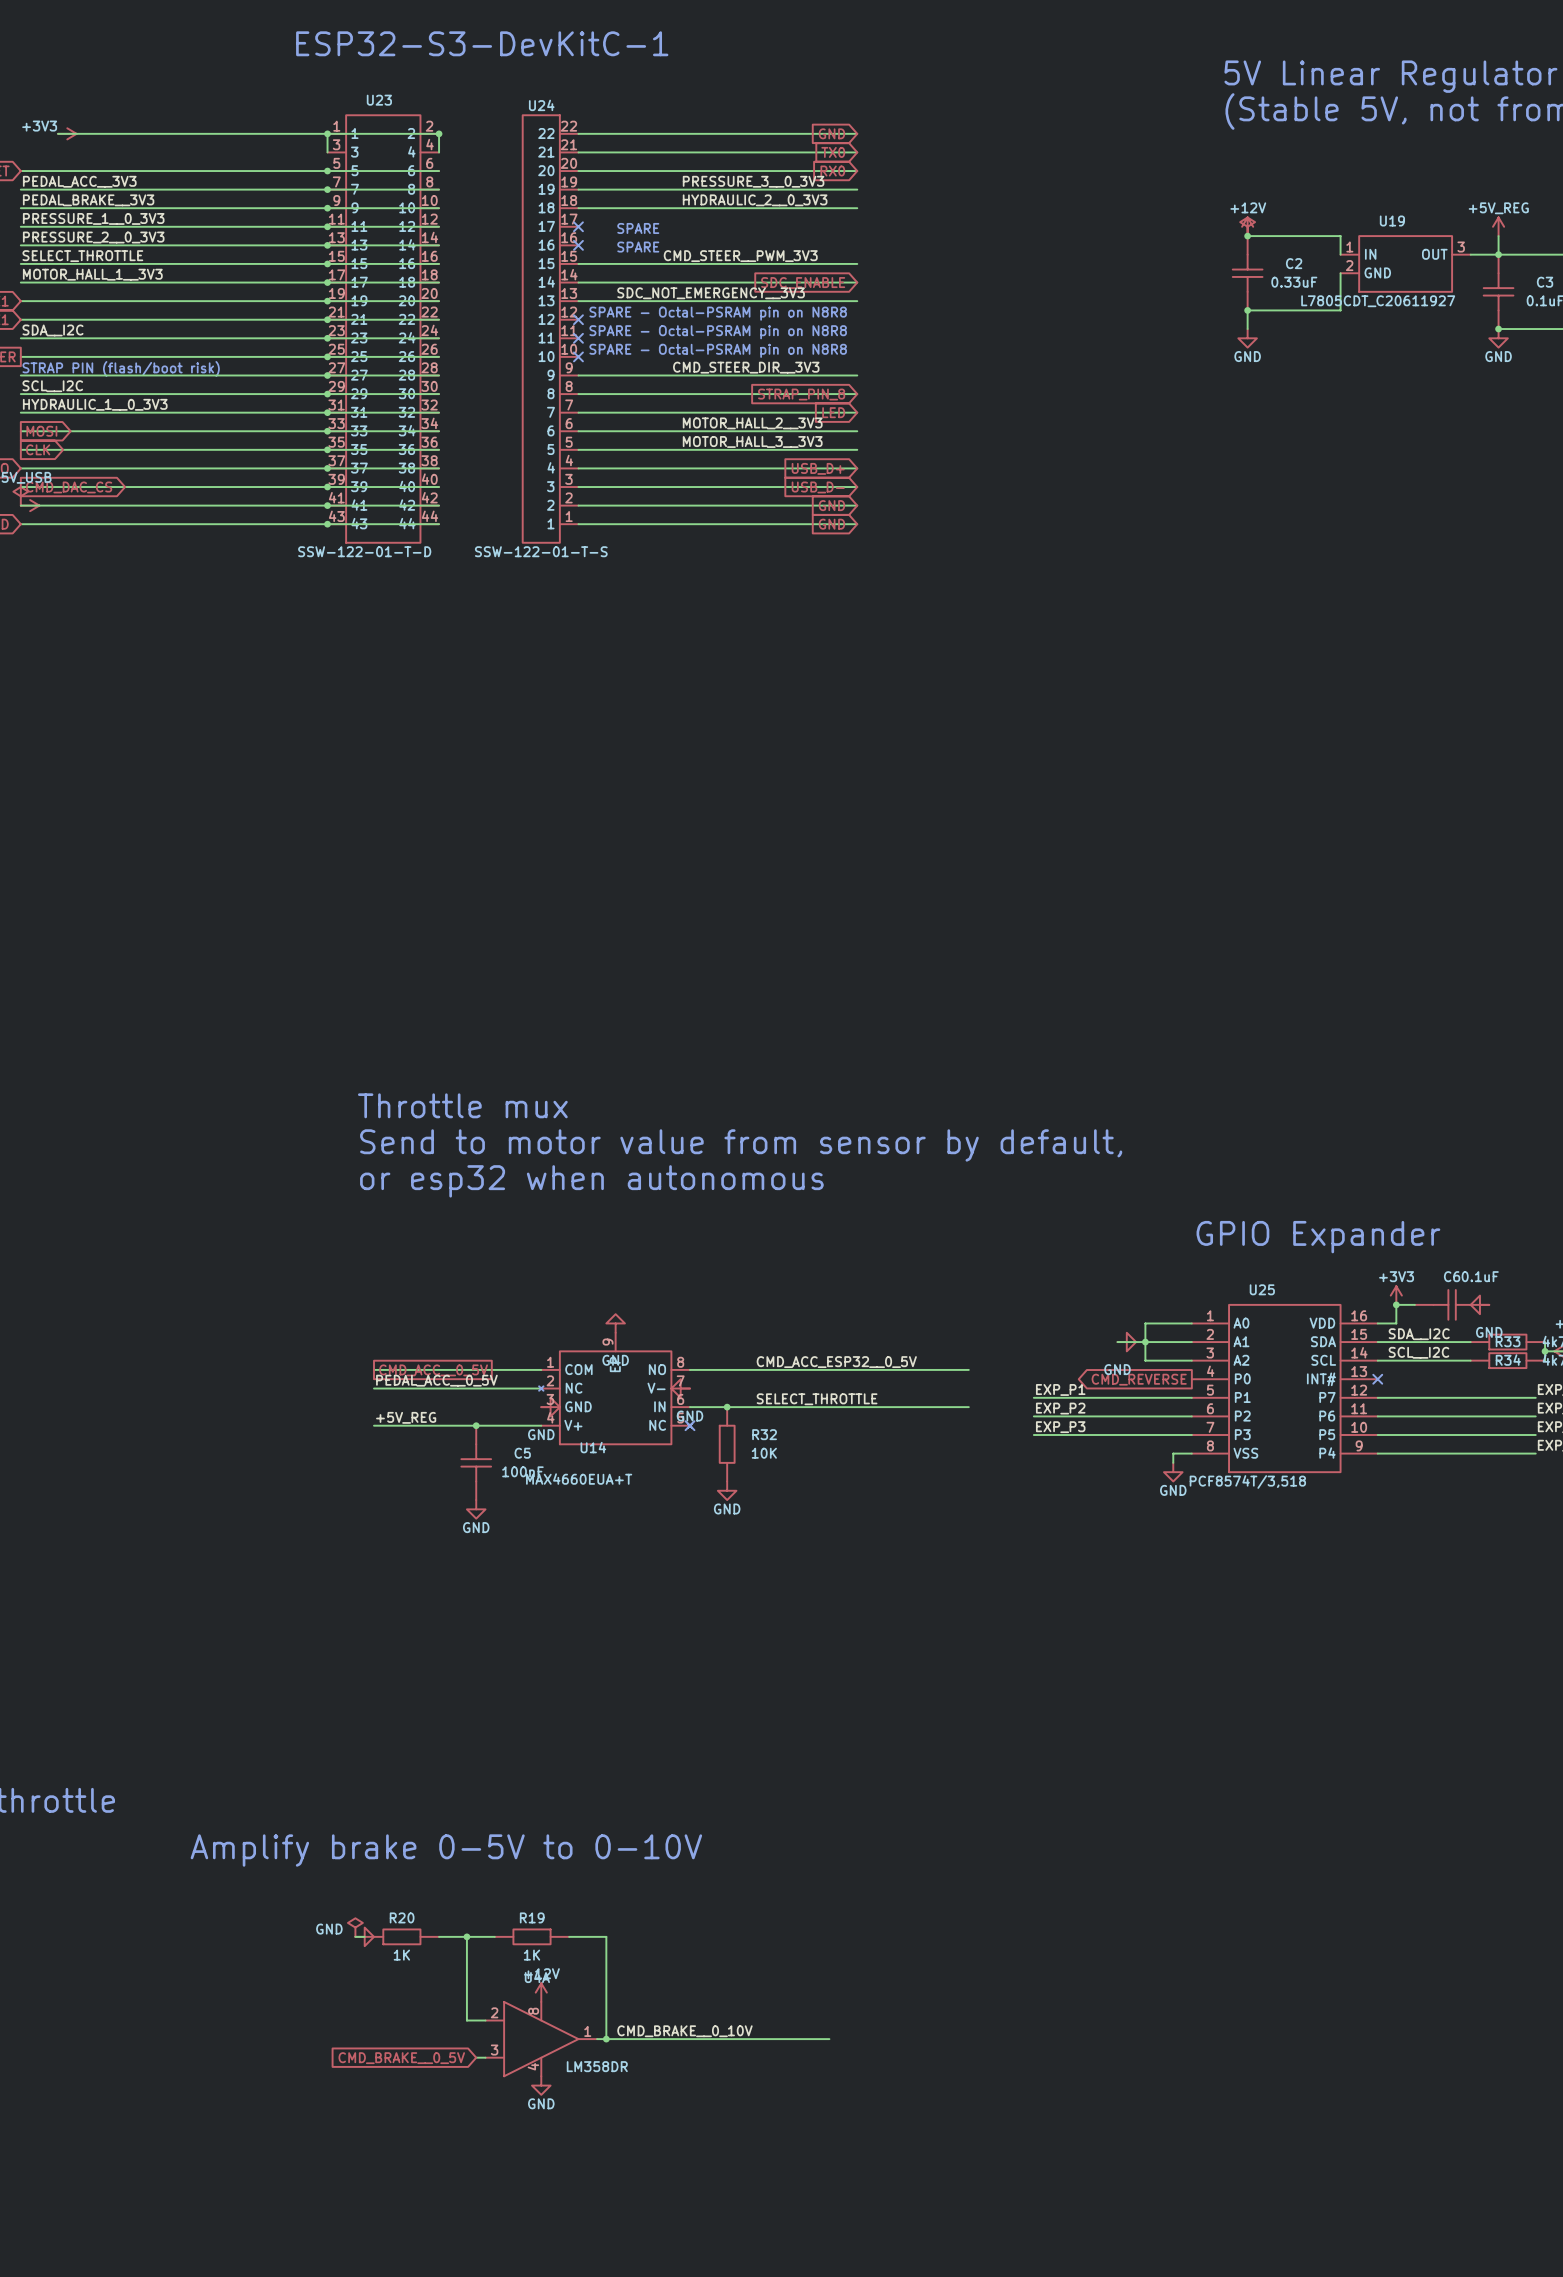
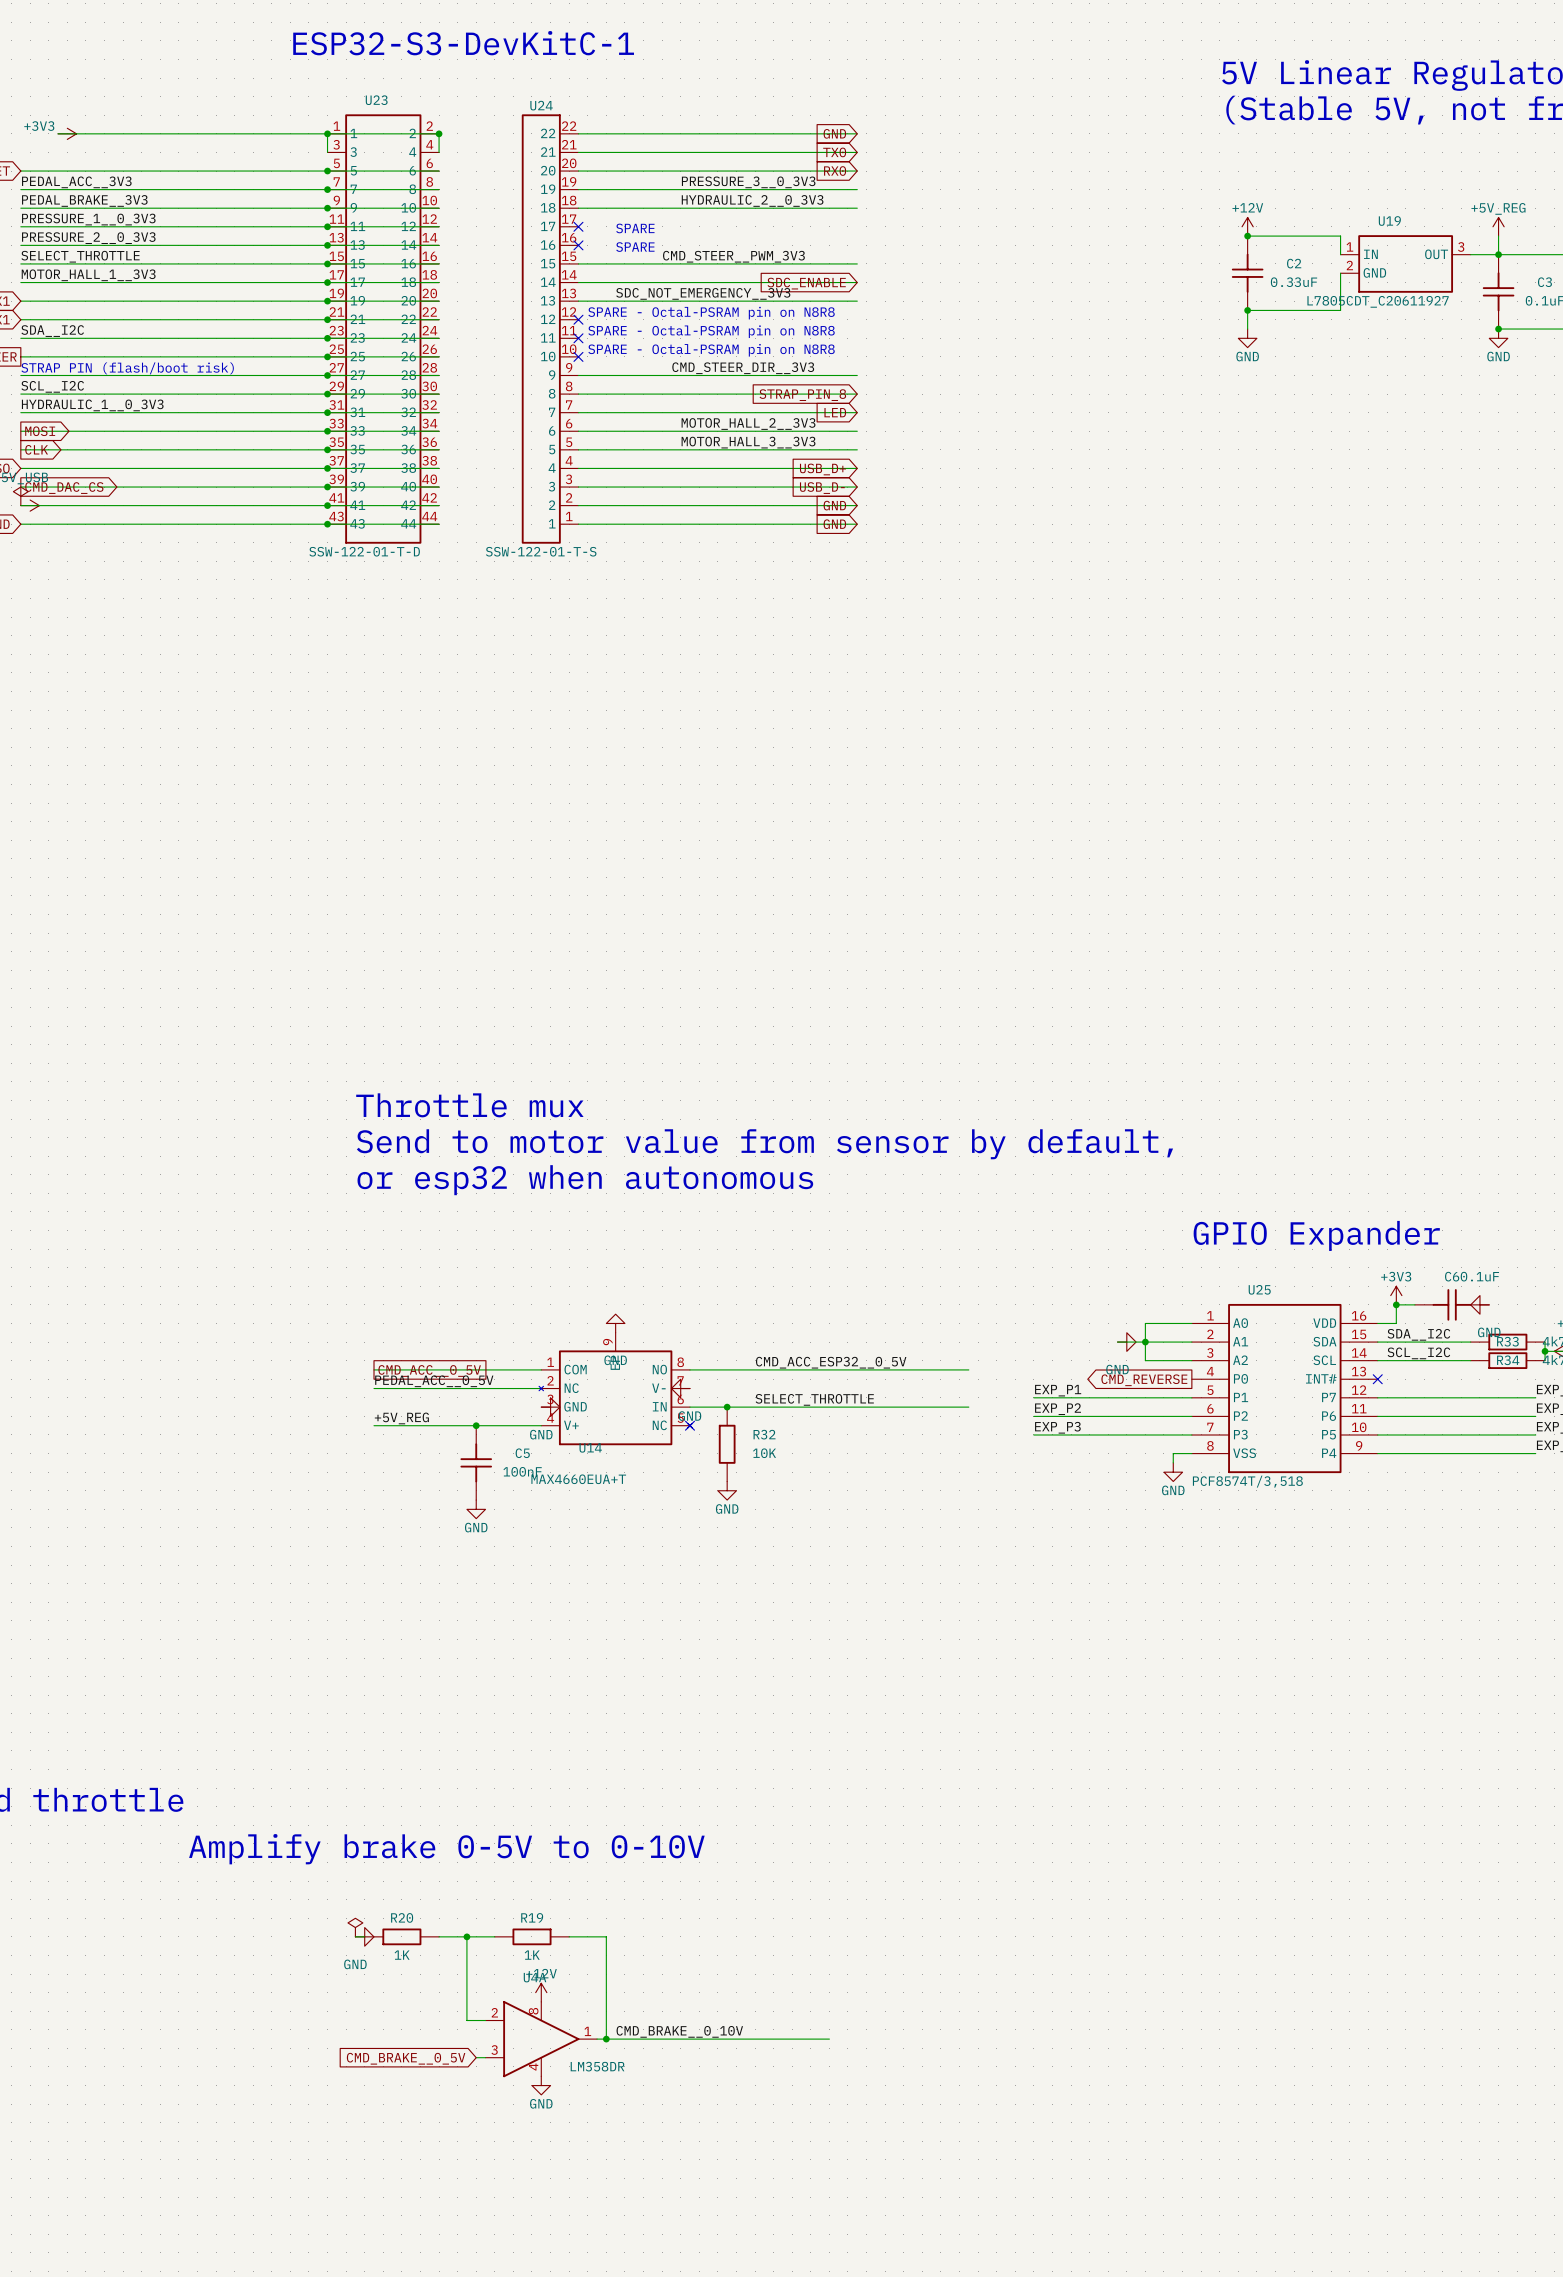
power symbol: (1247, 226) -> none
power symbol text position: GND (329, 1929) -> GND (355, 1964)

